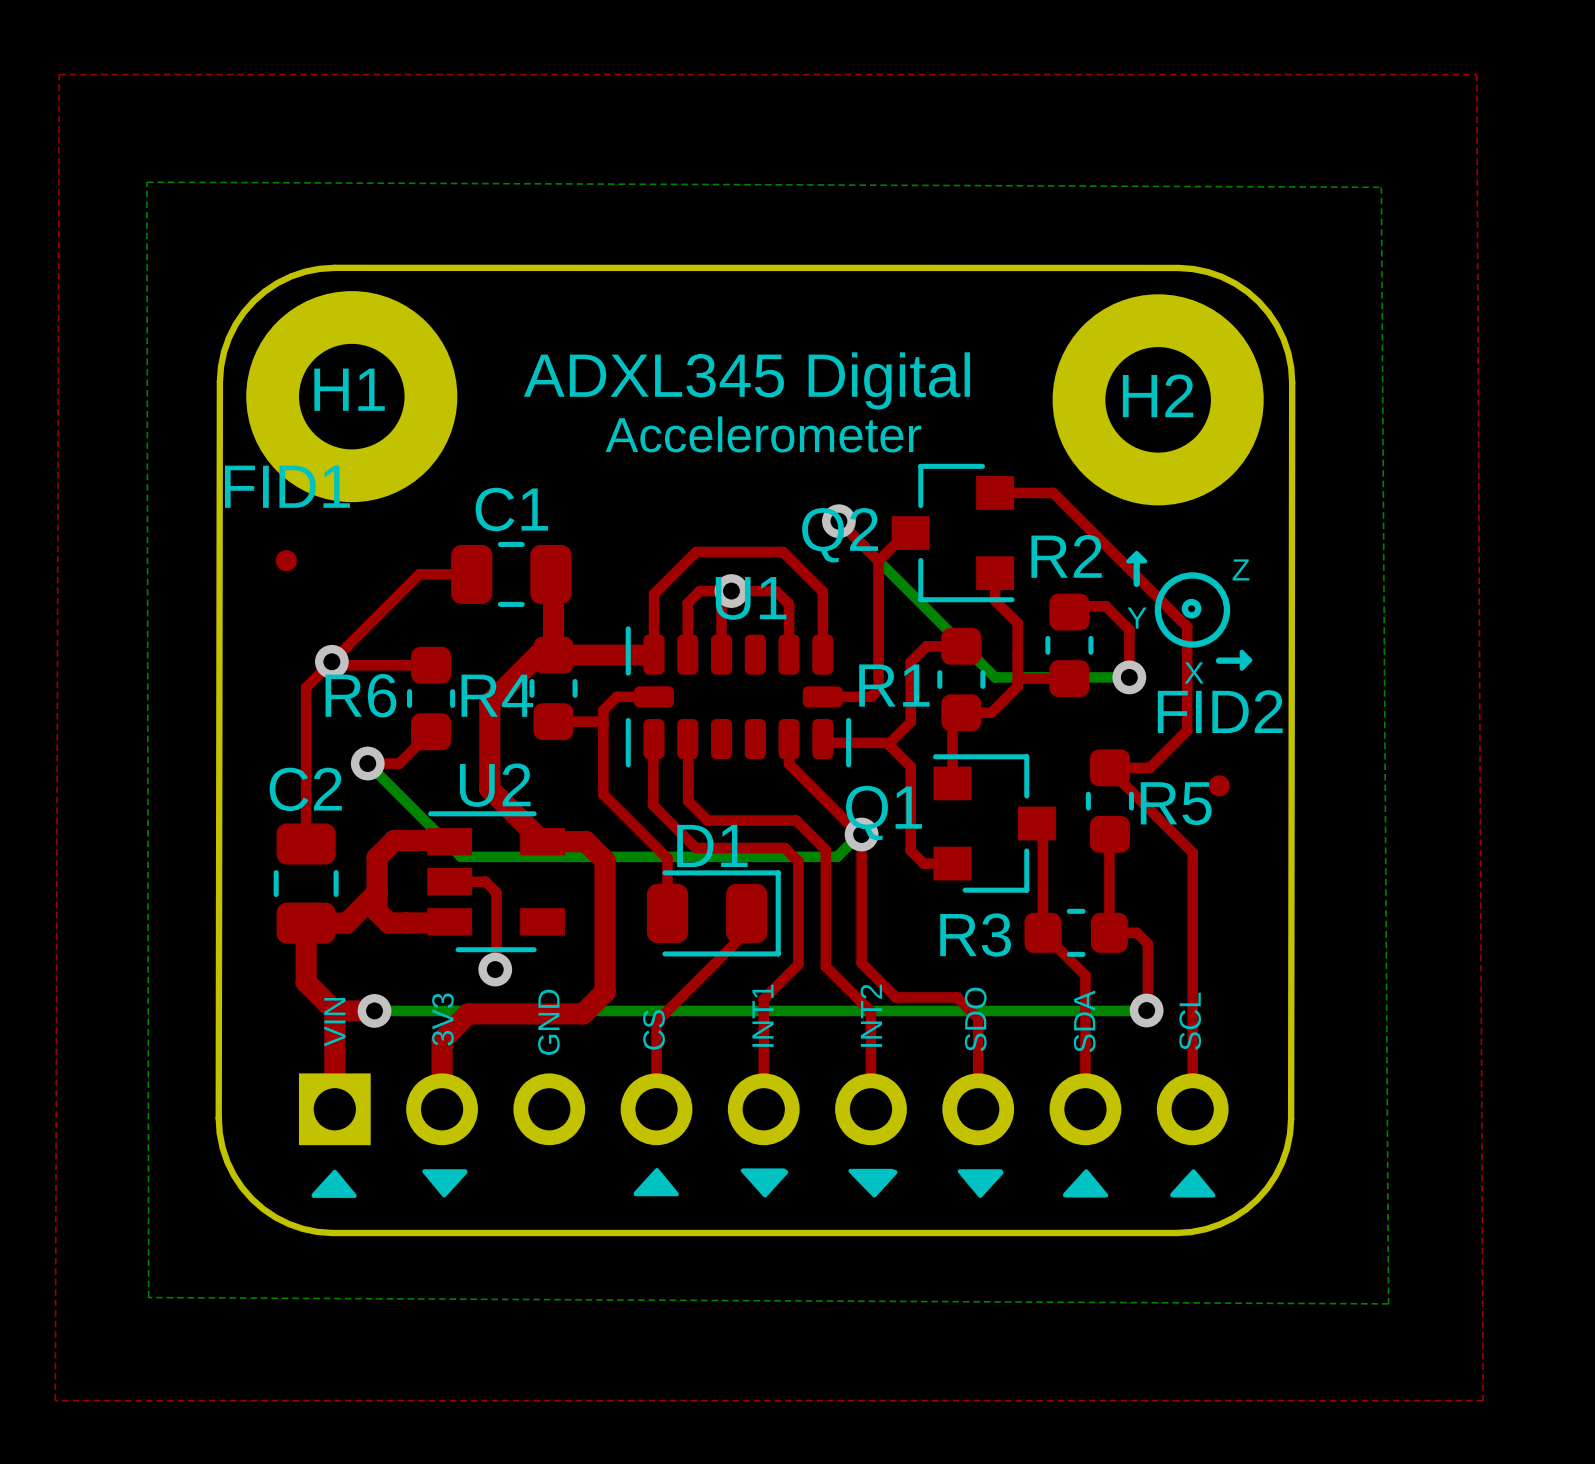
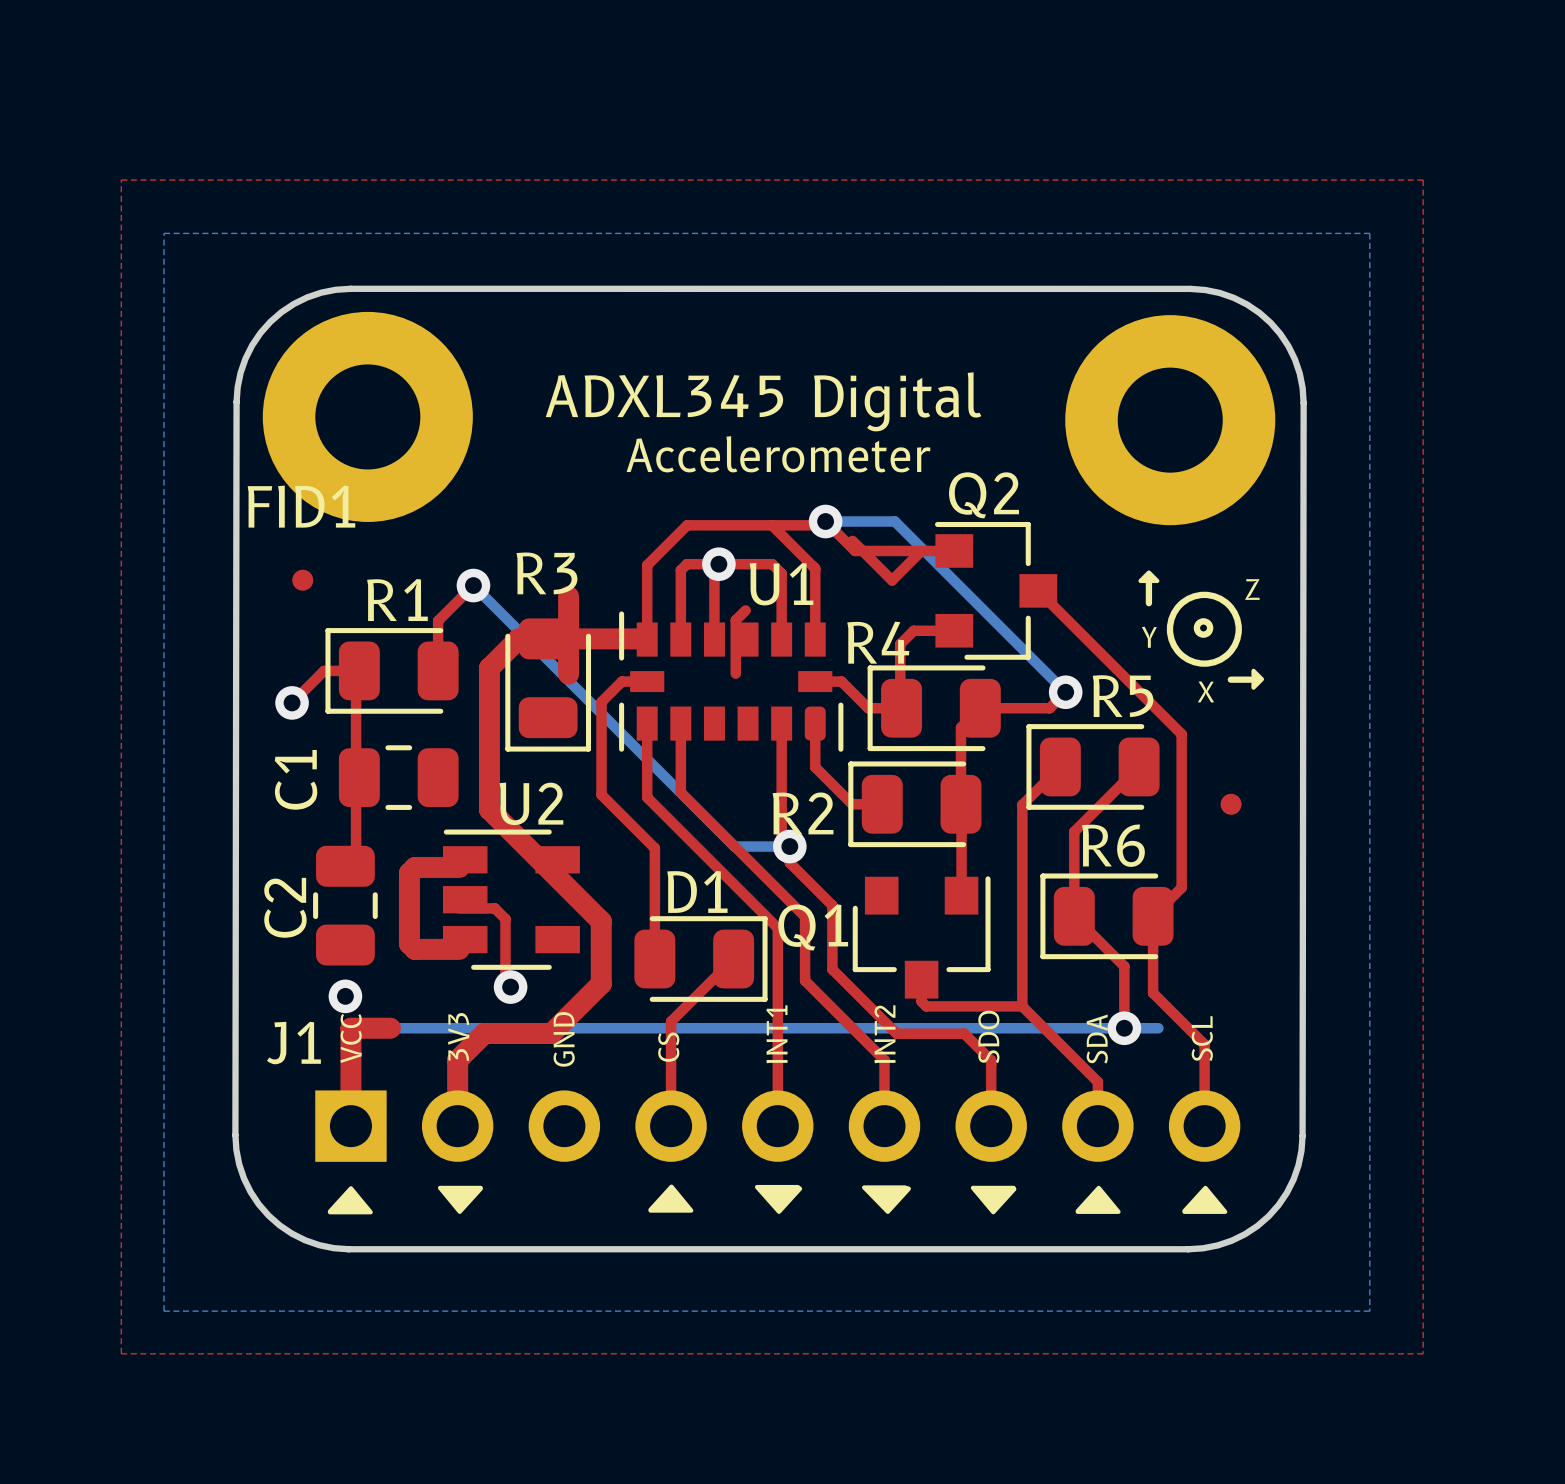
top zone outline: (59, 74) (55, 1400) (1483, 1400) (1476, 74) (59, 74) -> (121, 180) (121, 1353) (1423, 1353) (1423, 180) (121, 180)
bottom zone outline: (146, 182) (148, 1297) (1388, 1303) (1381, 187) (146, 182) -> (164, 233) (164, 1311) (1369, 1311) (1369, 233) (164, 233)
H1 name: H1 (349, 389) -> none
H2 name: H2 (1158, 395) -> none
top track: (995, 492) (1053, 492) (1187, 626) (1187, 730) (1149, 767) (1109, 767) (1109, 769) (1192, 852) (1192, 1027) -> (1038, 590) (1181, 734) (1181, 887) (1153, 916) (1153, 993) (1204, 1044)
bottom track: none -> (825, 521) (894, 521) (1065, 692)
top track: none -> (772, 525) (815, 568) (815, 639)
C1 name rotation: 0° (511, 509) -> 90° counterclockwise (296, 779)
C1 name position: C1 (511, 509) -> C1 (296, 779)
bottom track: (838, 521) (995, 677) (1129, 677) -> none
via position: (838, 521) -> (825, 521)
top track: none -> (954, 550) (855, 550) (825, 521) (821, 525) (687, 525) (647, 565) (647, 639)
Q2 rotation: 0° (953, 533) -> 180° (996, 590)
Q2 name position: Q2 (840, 535) -> Q2 (984, 495)
top track: none -> (714, 570) (714, 639)
R2 name position: R2 (1066, 556) -> R2 (803, 813)
top track: (878, 560) (878, 689) (870, 696) (822, 696) -> none
top track: none -> (473, 585) (438, 620) (438, 670)
bottom track: none -> (473, 585) (734, 846) (789, 846)
via: none -> (473, 585)
top track: (995, 573) (995, 600) (1017, 623) (1017, 686) (991, 712) (961, 712) (952, 721) (952, 783) -> none
top track: (471, 574) (419, 574) (306, 687) (306, 843) -> none
C1 position: (511, 574) -> (398, 777)
via position: (731, 591) -> (718, 564)
R2 footprint: [1045, 593, 1094, 698] -> [848, 761, 982, 848]
top track: (1077, 606) (1105, 606) (1129, 629) (1129, 677) -> none
top track: none -> (954, 630) (913, 630) (900, 644) (901, 708) (868, 708) (841, 681) (815, 681)
top track: none -> (680, 639) (680, 570) (686, 564) (772, 564) (781, 573) (781, 639)
U1 footprint: [625, 626, 852, 768] -> [619, 611, 844, 752]
R1 footprint: [937, 627, 986, 732] -> [325, 628, 459, 714]
R4 footprint: [529, 636, 578, 741] -> [867, 665, 1001, 752]
R6 footprint: [407, 646, 456, 751] -> [1040, 873, 1174, 960]
top track: (961, 646) (926, 646) (910, 662) (910, 722) (889, 743) -> none
top track: none -> (359, 670) (324, 670) (292, 702)
top track: (653, 654) (653, 594) (696, 552) (783, 552) (822, 591) (822, 654) -> none
top track: (687, 654) (687, 603) (699, 591) (775, 591) (789, 604) (789, 654) -> none
top track: none -> (356, 674) (356, 777)
top track: (649, 655) (537, 655) (489, 703) (489, 788) (542, 841) (586, 841) (605, 860) (605, 991) (583, 1013) (468, 1013) (442, 1040) (442, 1043) -> (643, 639) (518, 638) (489, 668) (489, 809) (601, 921) (601, 983) (551, 1033) (484, 1033) (457, 1060)
top track: (331, 661) (335, 665) (431, 665) -> none
via: (331, 661) -> none
top track: none -> (647, 681) (621, 681) (601, 702) (601, 794) (654, 848) (654, 959)
top track: none -> (1065, 692) (1049, 708) (980, 708) (961, 727) (961, 804)
via position: (1129, 677) -> (1065, 692)
top track: (1069, 678) (1020, 678) (1017, 681) -> none
via: none -> (292, 702)
R1 name position: R1 (894, 685) -> R1 (397, 600)
R6 name position: R6 (360, 695) -> R6 (1113, 845)
top track: (653, 696) (616, 696) (603, 710) (603, 794) (667, 858) (667, 913) -> none
top track: none -> (781, 723) (781, 854)
top track: none -> (815, 723) (815, 767) (852, 804) (882, 804)
FID2 name: FID2 (1220, 711) -> none
top track: (553, 721) (601, 721) (603, 723) -> none
top track: (431, 731) (399, 763) (367, 763) -> none
top track: (789, 739) (789, 764) (861, 834) (861, 963) (895, 997) (957, 997) (978, 1018) (978, 1043) -> (789, 846) (789, 862) (832, 905) (832, 969) (896, 1033) (964, 1033) (991, 1060)
top track: (822, 739) (826, 742) (889, 742) (910, 766) (910, 850) (923, 863) (952, 863) -> none
top track: none -> (1060, 766) (1022, 804) (1022, 1006)
top track: none -> (1139, 766) (1074, 831) (1074, 916) (1124, 966) (1124, 1028)
R5 footprint: [1085, 749, 1134, 853] -> [1026, 724, 1160, 810]
top track: (653, 758) (653, 805) (695, 847) (784, 847) (798, 861) (798, 964) (763, 999) -> (647, 723) (647, 797) (777, 928) (777, 1016)
top track: (688, 758) (688, 801) (707, 820) (796, 820) (825, 850) (825, 966) (870, 1011) (870, 1043) -> (680, 723) (680, 792) (805, 916) (805, 980) (884, 1060)
top track: none -> (356, 780) (356, 866)
bottom track: (367, 763) (461, 856) (837, 856) (861, 834) -> none
via: (367, 763) -> none
U2 name position: U2 (495, 785) -> U2 (531, 803)
top track: none -> (961, 804) (961, 895)
C2 name rotation: 0° (305, 789) -> 90° counterclockwise (285, 907)
Q1 rotation: 0° (994, 823) -> 90° clockwise (921, 937)
Q1 position: (994, 823) -> (921, 937)
top track: (1042, 823) (1042, 932) (1085, 975) (1085, 1064) -> (1022, 1006) (1097, 1081)
via position: (861, 834) -> (789, 846)
top track: (1109, 834) (1109, 932) (1136, 932) (1147, 943) (1147, 1004) -> none
top track: (449, 840) (394, 840) (377, 857) (377, 911) (388, 922) (449, 922) -> none
top track: none -> (459, 867) (415, 867) (409, 873) (409, 943) (415, 949) (459, 949)
top track: (449, 881) (485, 881) (496, 892) (495, 969) -> none
C2 position: (306, 883) -> (345, 905)
top track: none -> (459, 908) (494, 908) (505, 918) (505, 989)
top track: (377, 892) (346, 923) (306, 923) (306, 982) (334, 1010) -> none
R3 footprint: [1024, 908, 1128, 957] -> [505, 618, 592, 752]
D1 position: (713, 913) -> (700, 959)
top track: (746, 913) (746, 931) (656, 1021) -> (733, 959) (671, 1021) (671, 1039)
R3 name position: R3 (975, 935) -> R3 (546, 573)
top track: none -> (921, 979) (921, 1001) (926, 1006) (1022, 1006)
via position: (374, 1010) -> (345, 996)
via position: (1146, 1010) -> (1124, 1028)
text: VIN (334, 1022) -> VCC (351, 1038)
J1 name: none -> J1 (293, 1043)

